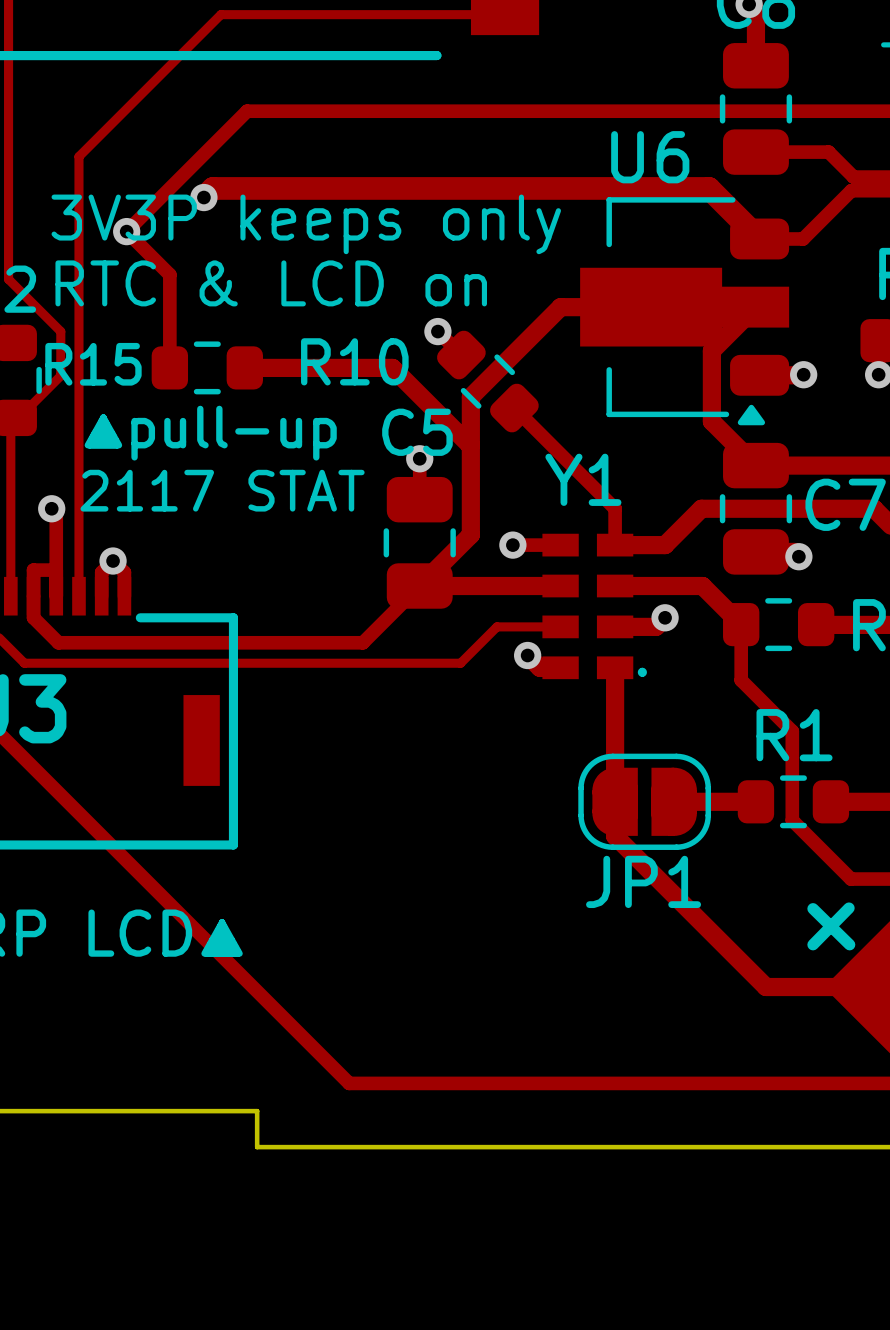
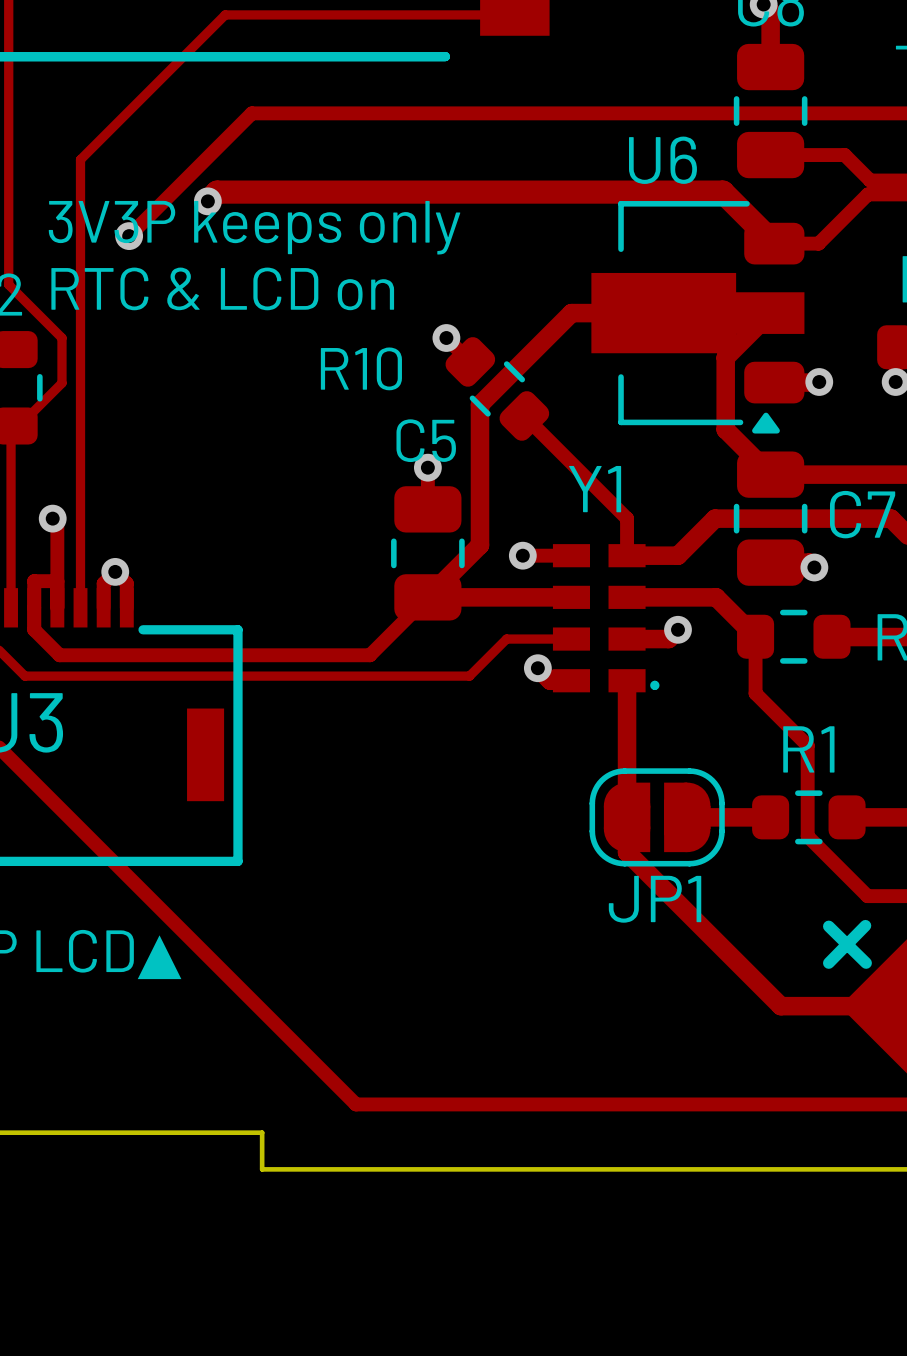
track: (126, 231) (169, 274) (169, 367) -> none
R15: (207, 367) -> none
track: (244, 367) (392, 367) (470, 445) -> none
text: ▲pull-up (210, 433) -> none
text: 2117 STAT (222, 490) -> none

